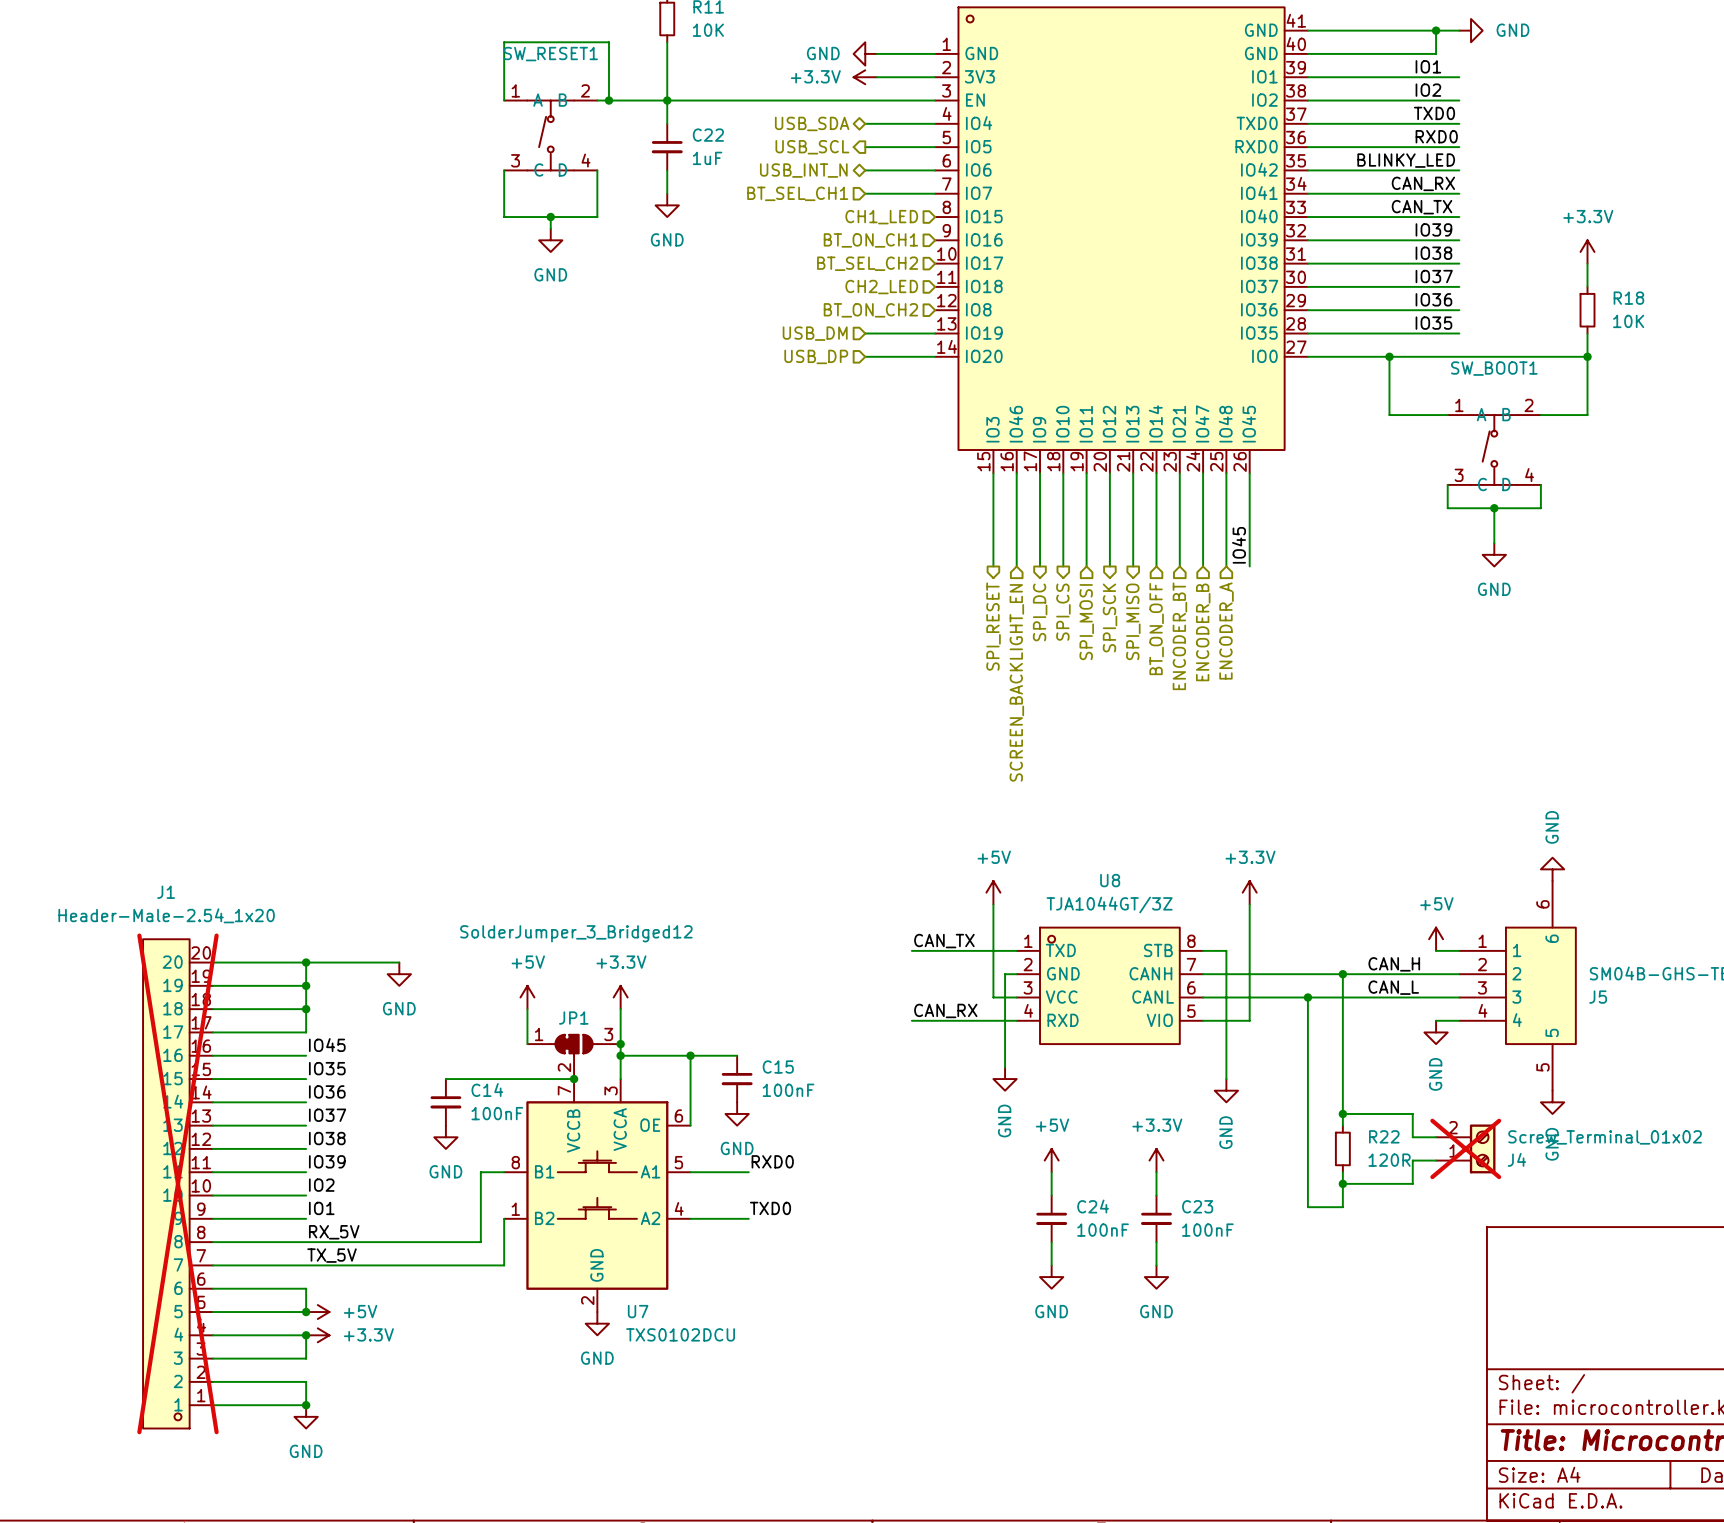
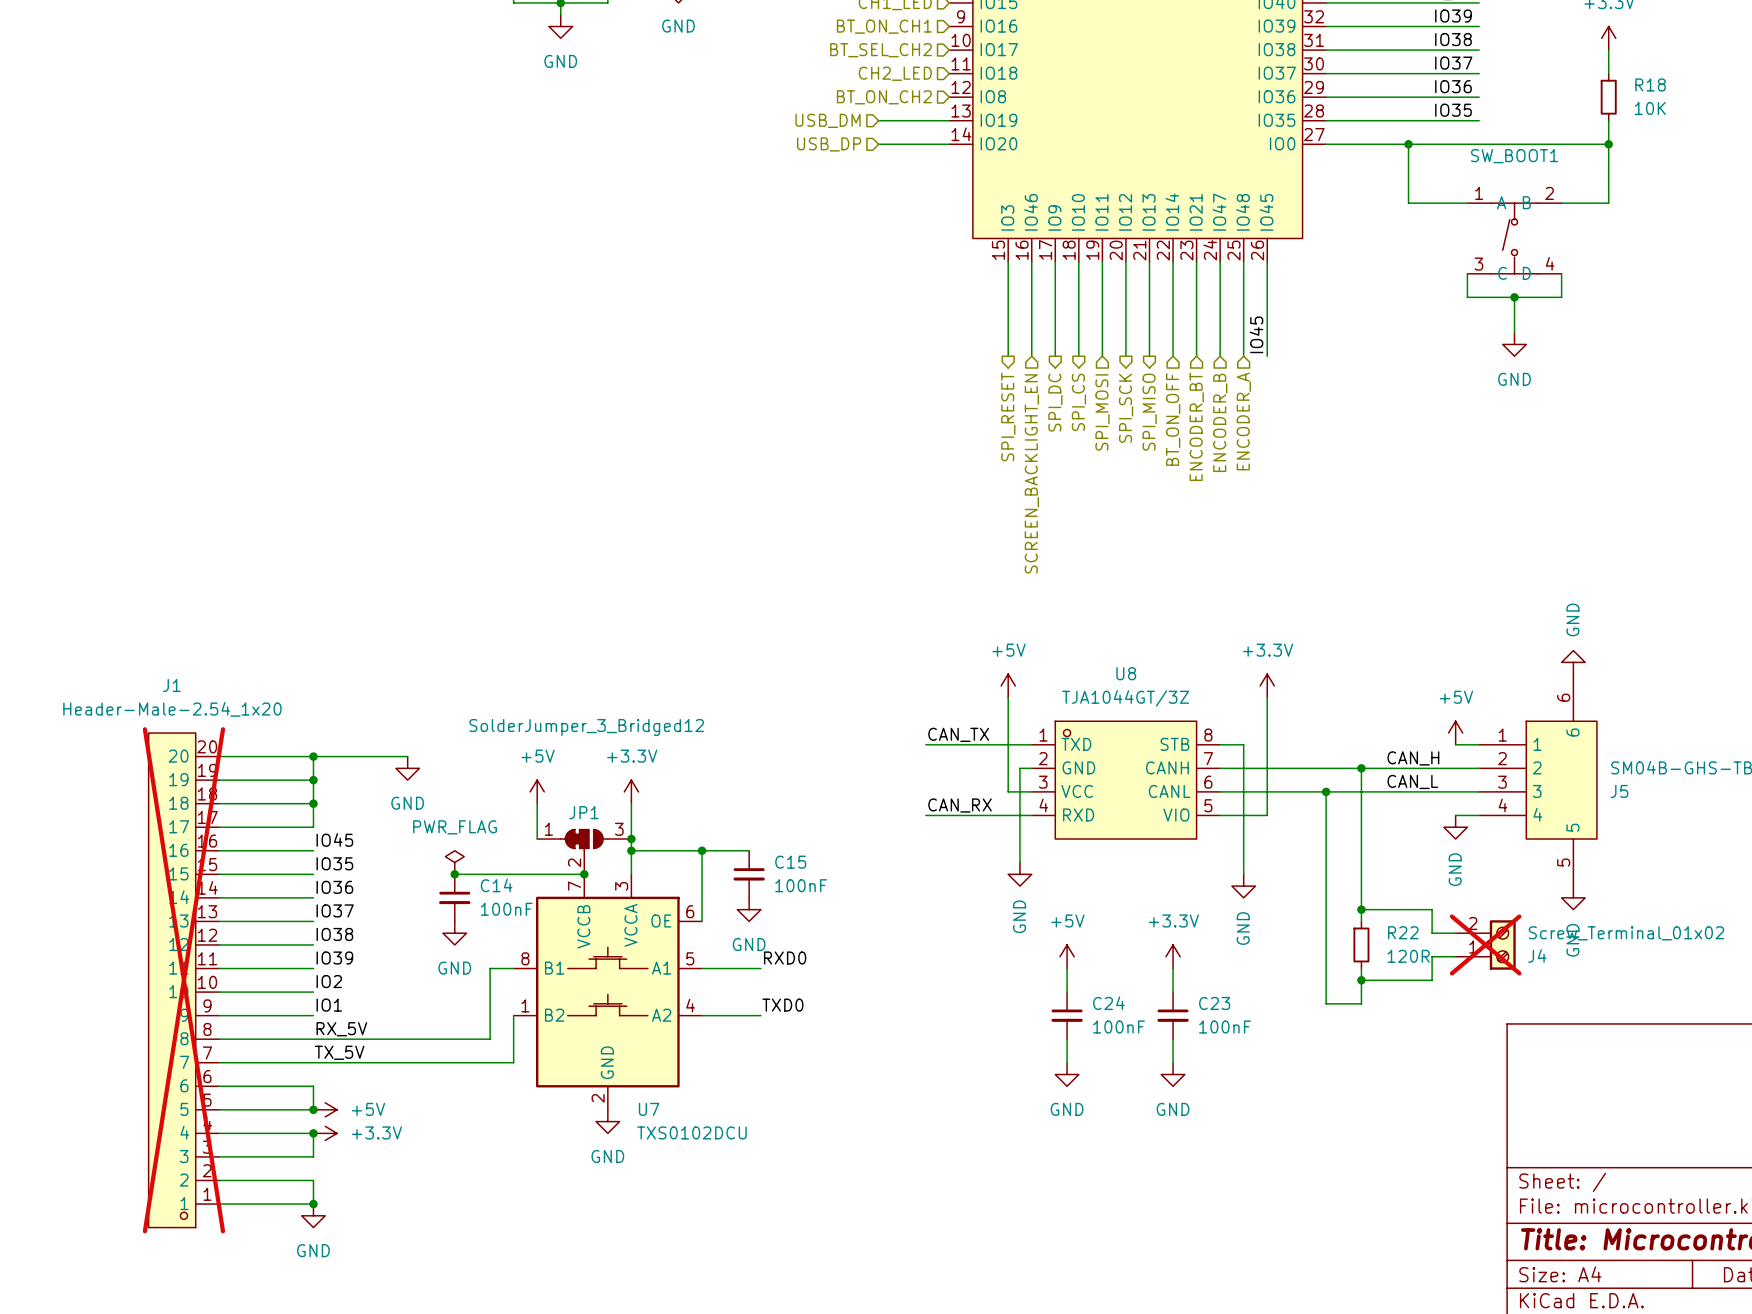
power symbol: none -> PWR_FLAG (454, 862)
junction: none -> (454, 874)

